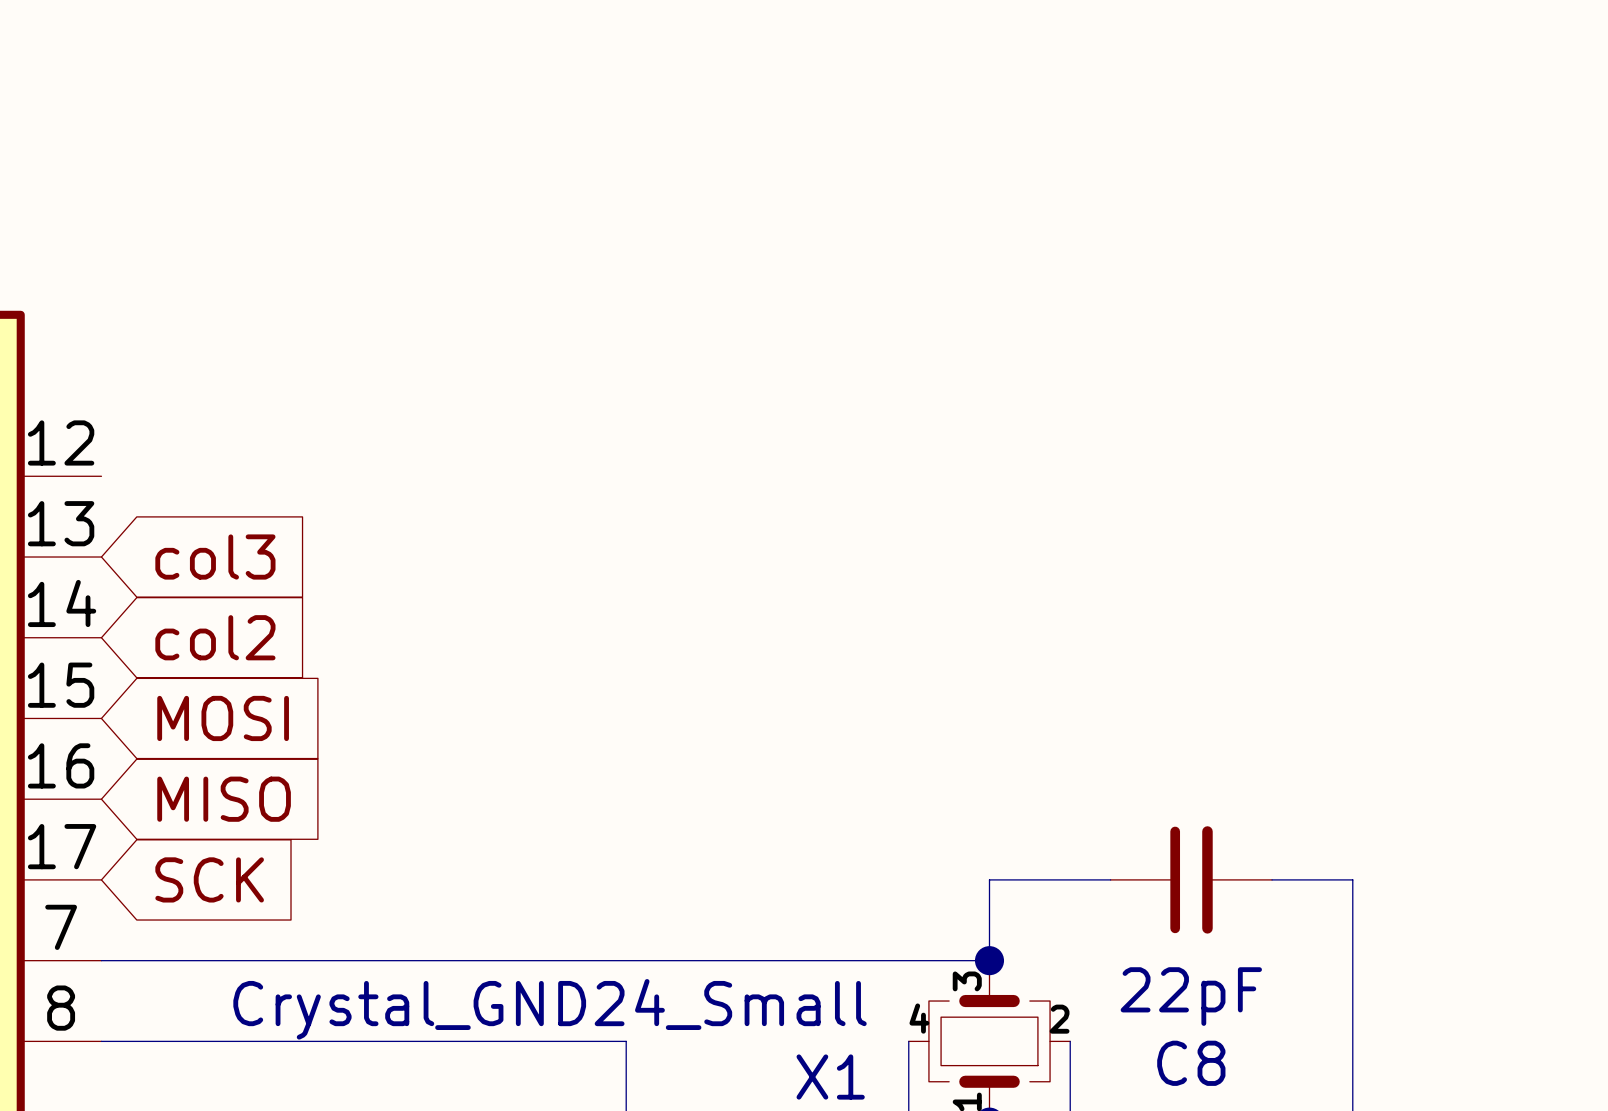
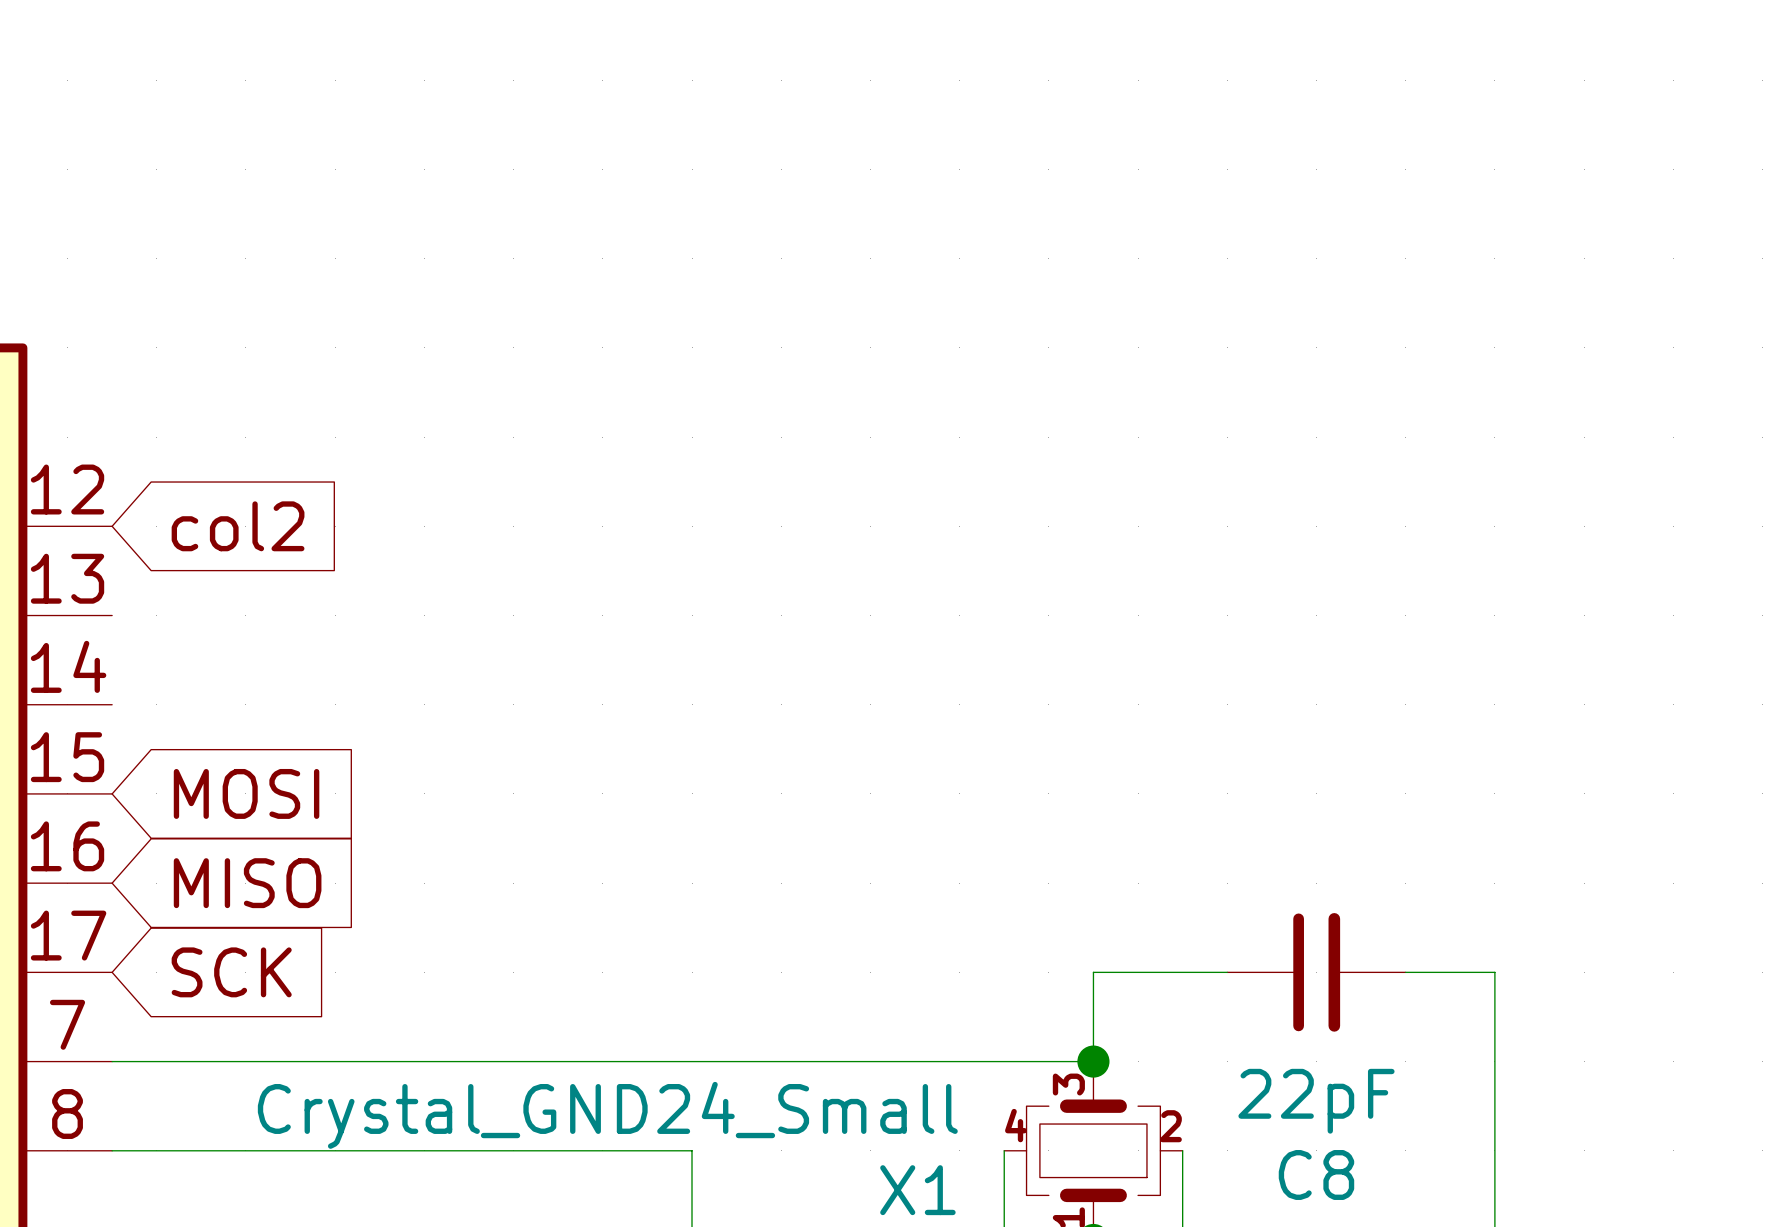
global label: col3 (215, 557) -> none
global label position: col2 (215, 637) -> col2 (238, 526)

